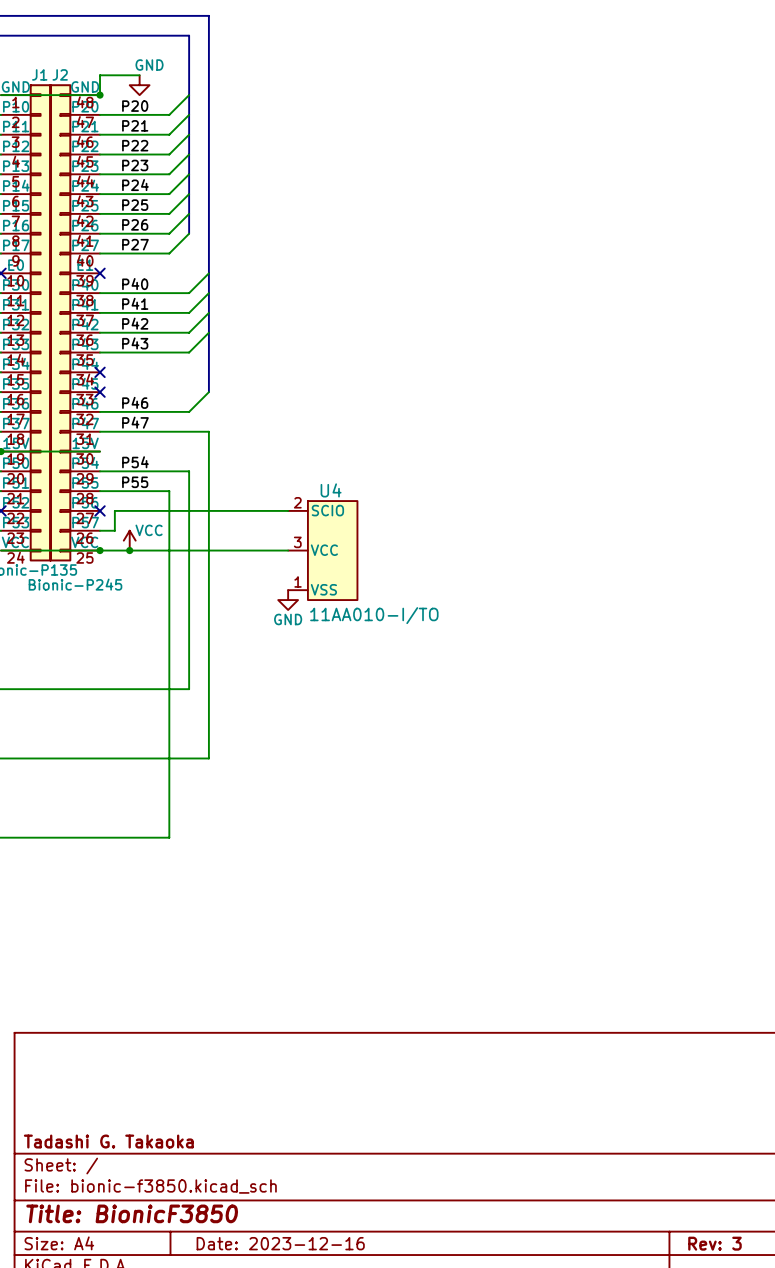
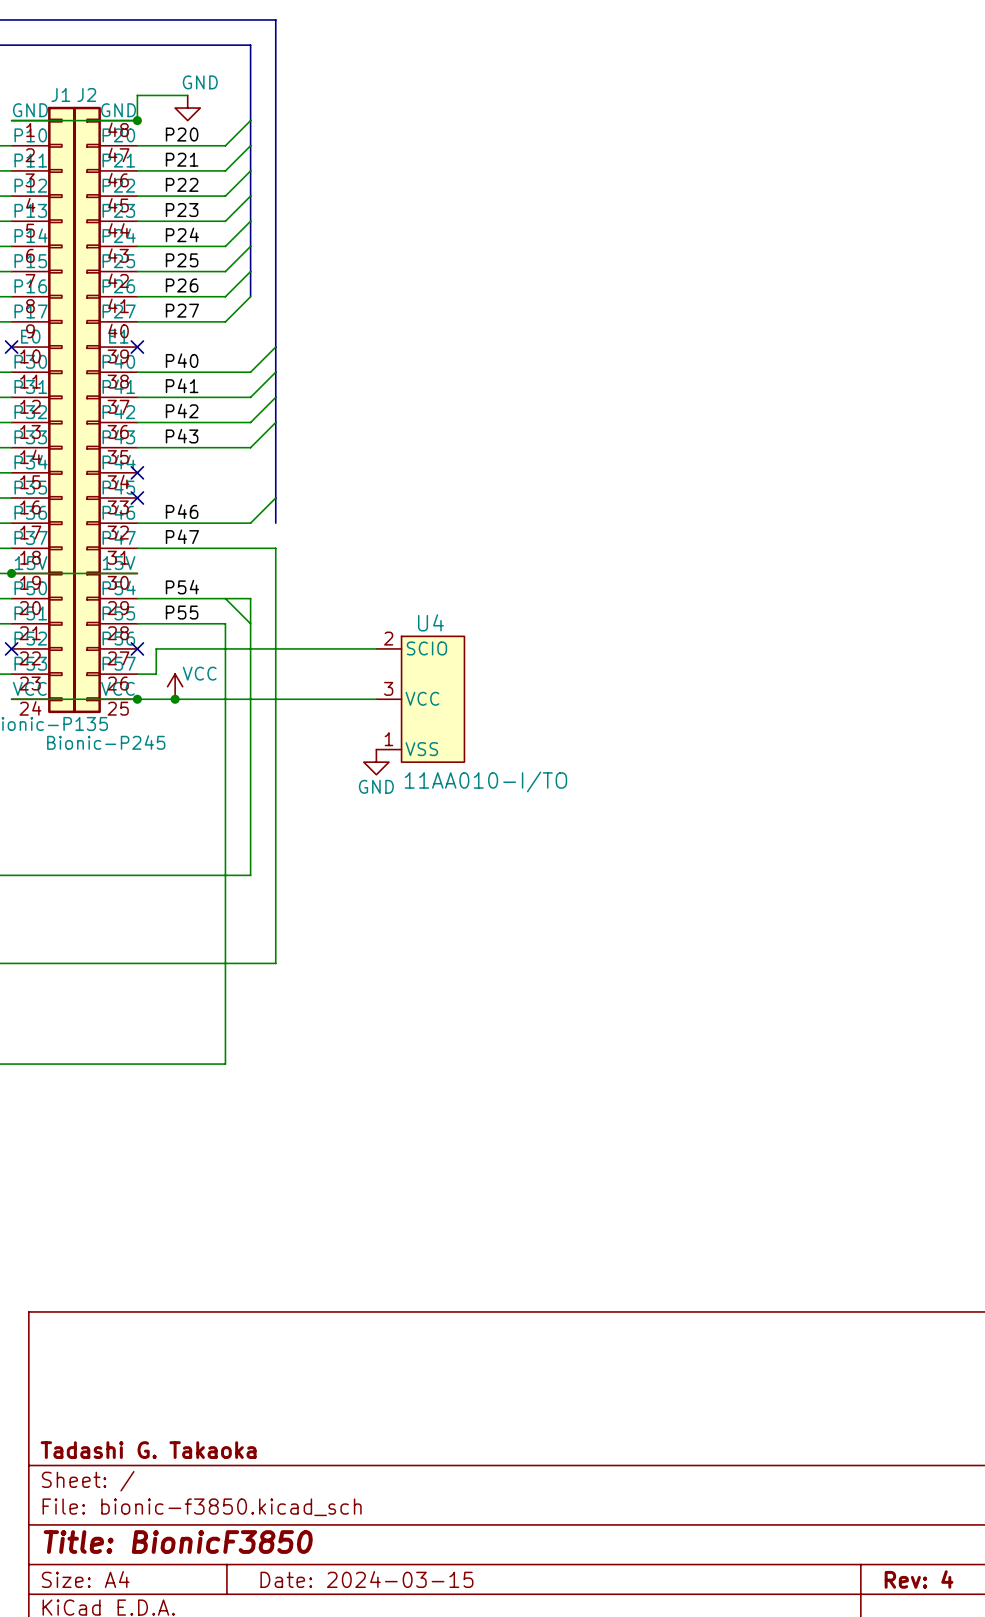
bus: none -> (275, 497) (275, 523)
wire: none -> (225, 598) (250, 623)
title block: Date: 2023-12-16 (280, 1243) -> Date: 2024-03-15 (366, 1579)
title block: Rev: 3 (714, 1243) -> Rev: 4 (919, 1579)

